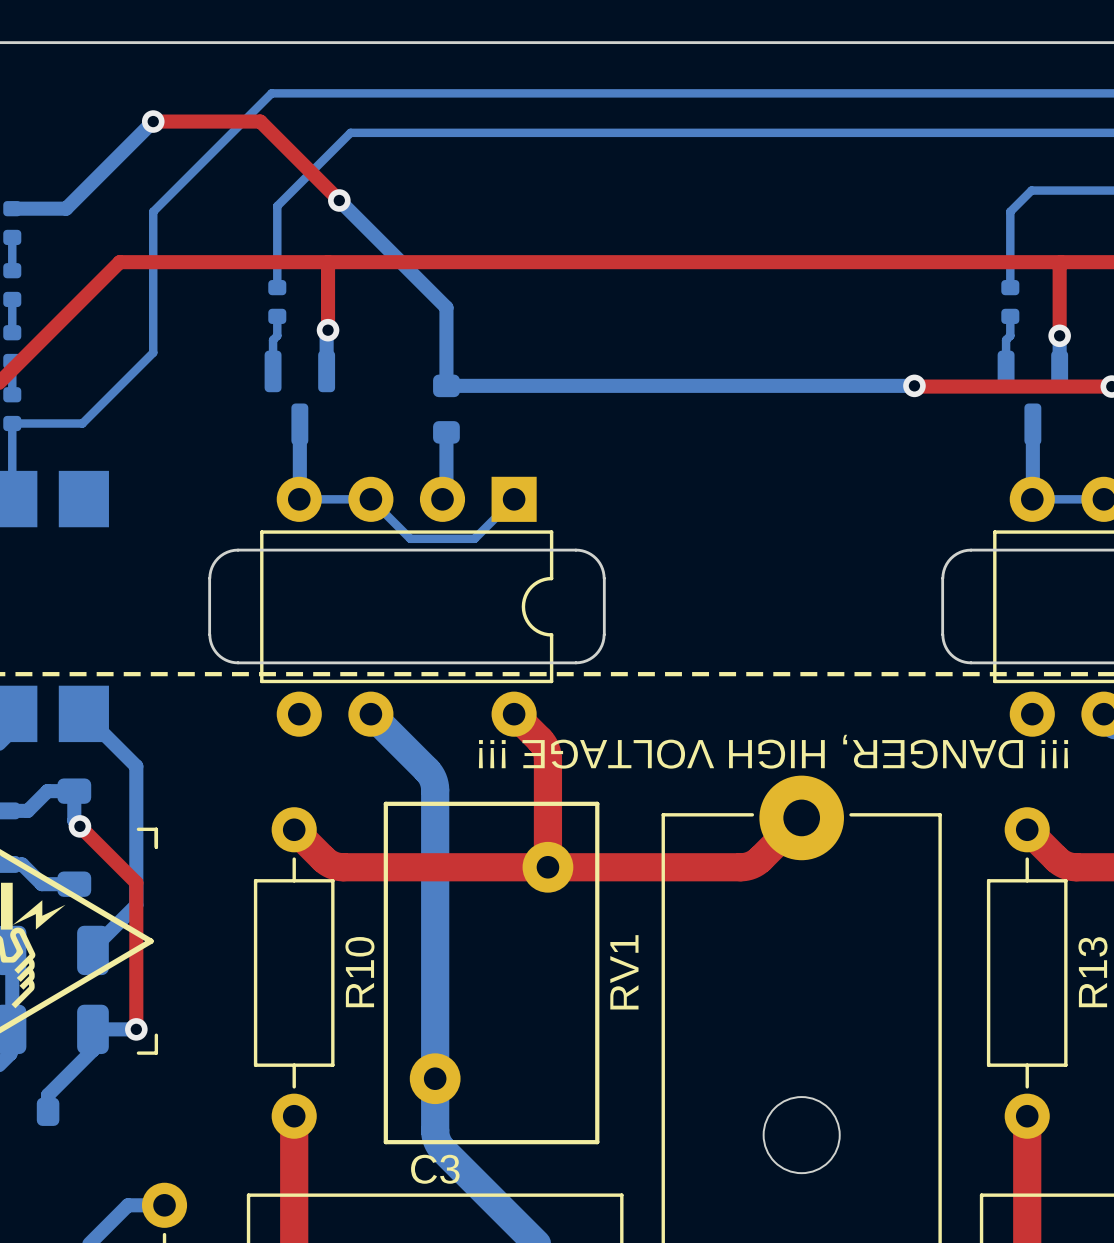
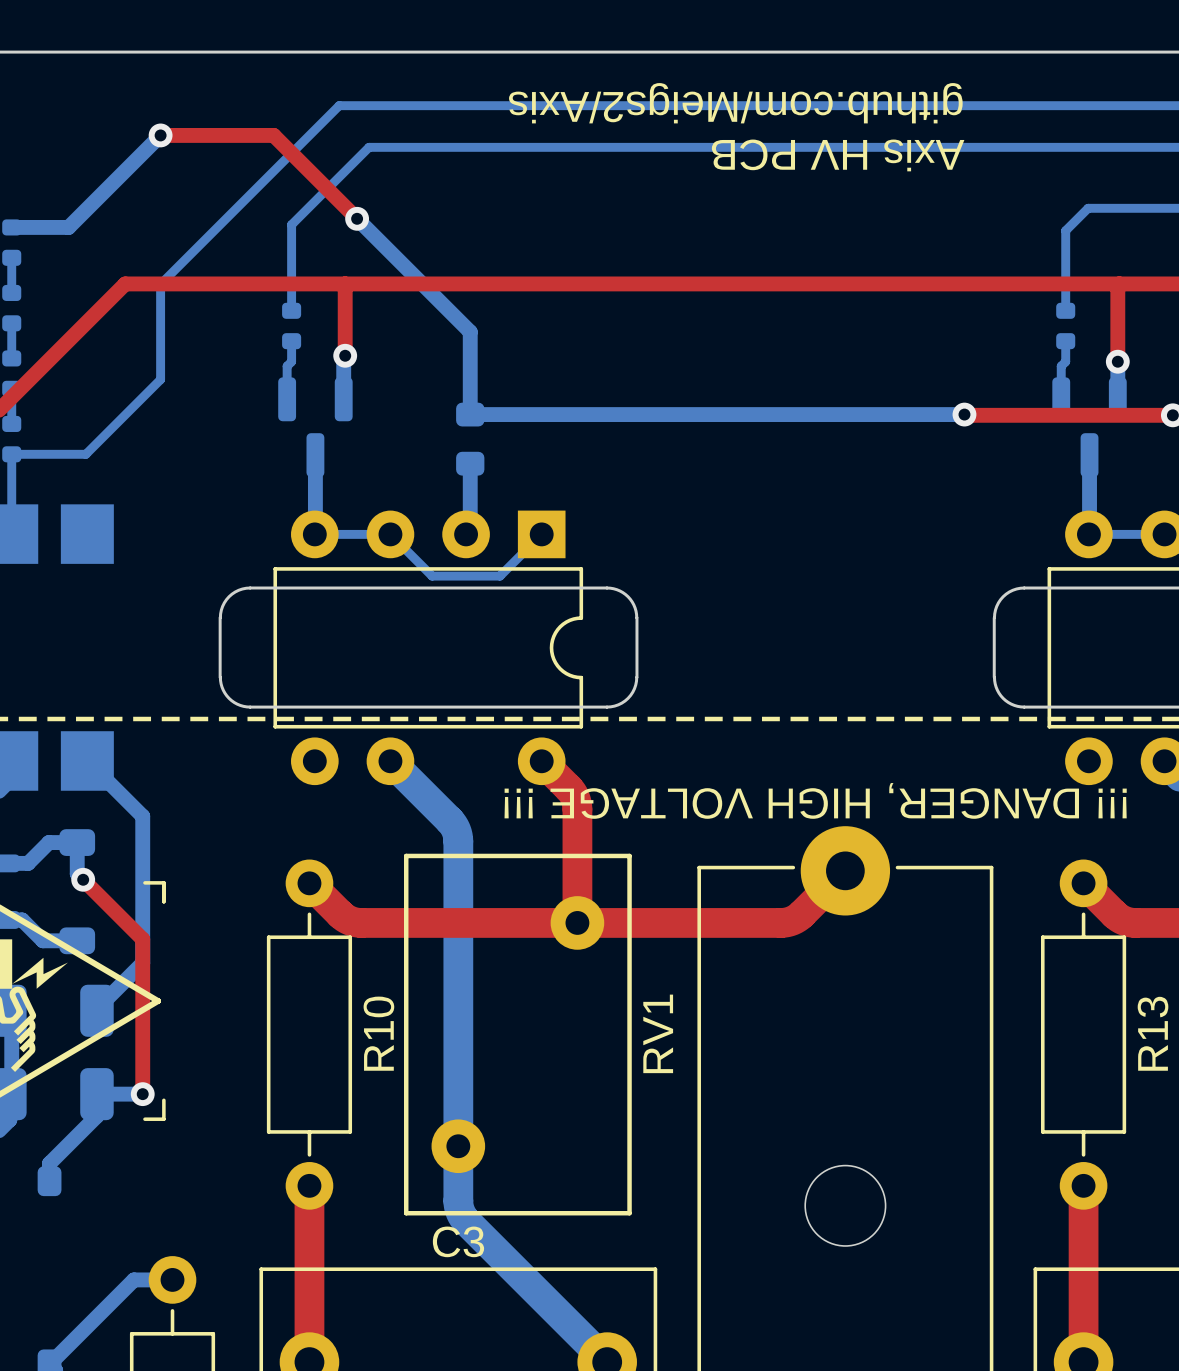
text: none -> github.com/Meigs2/Axis (735, 103)
bottom track: (322, 93) (271, 93) (153, 211) (153, 262) -> (339, 105) (160, 284)
text: none -> Axis HV PCB (838, 155)

